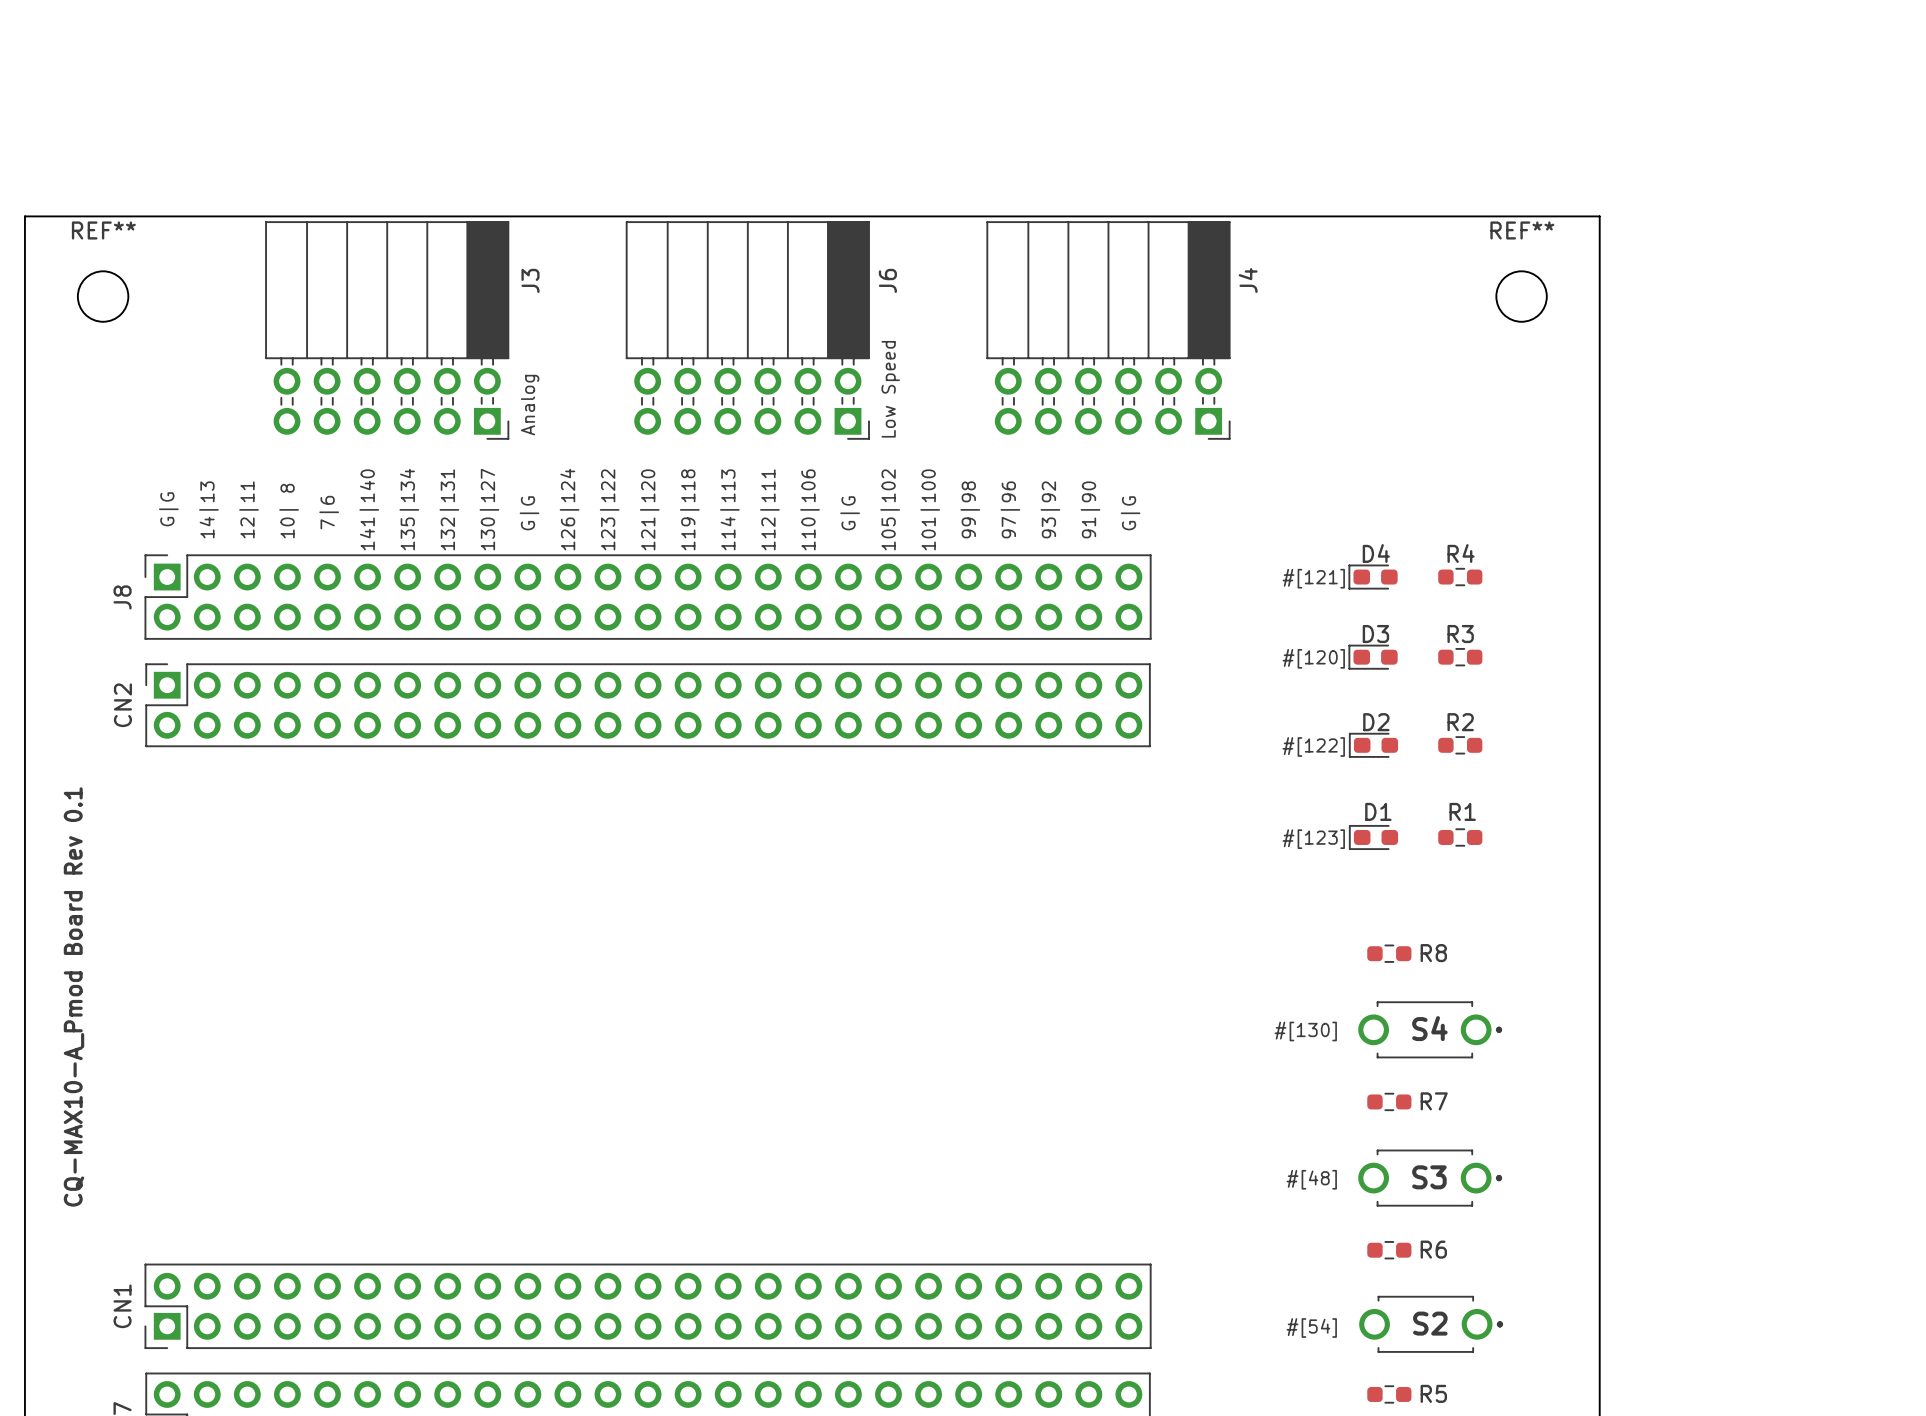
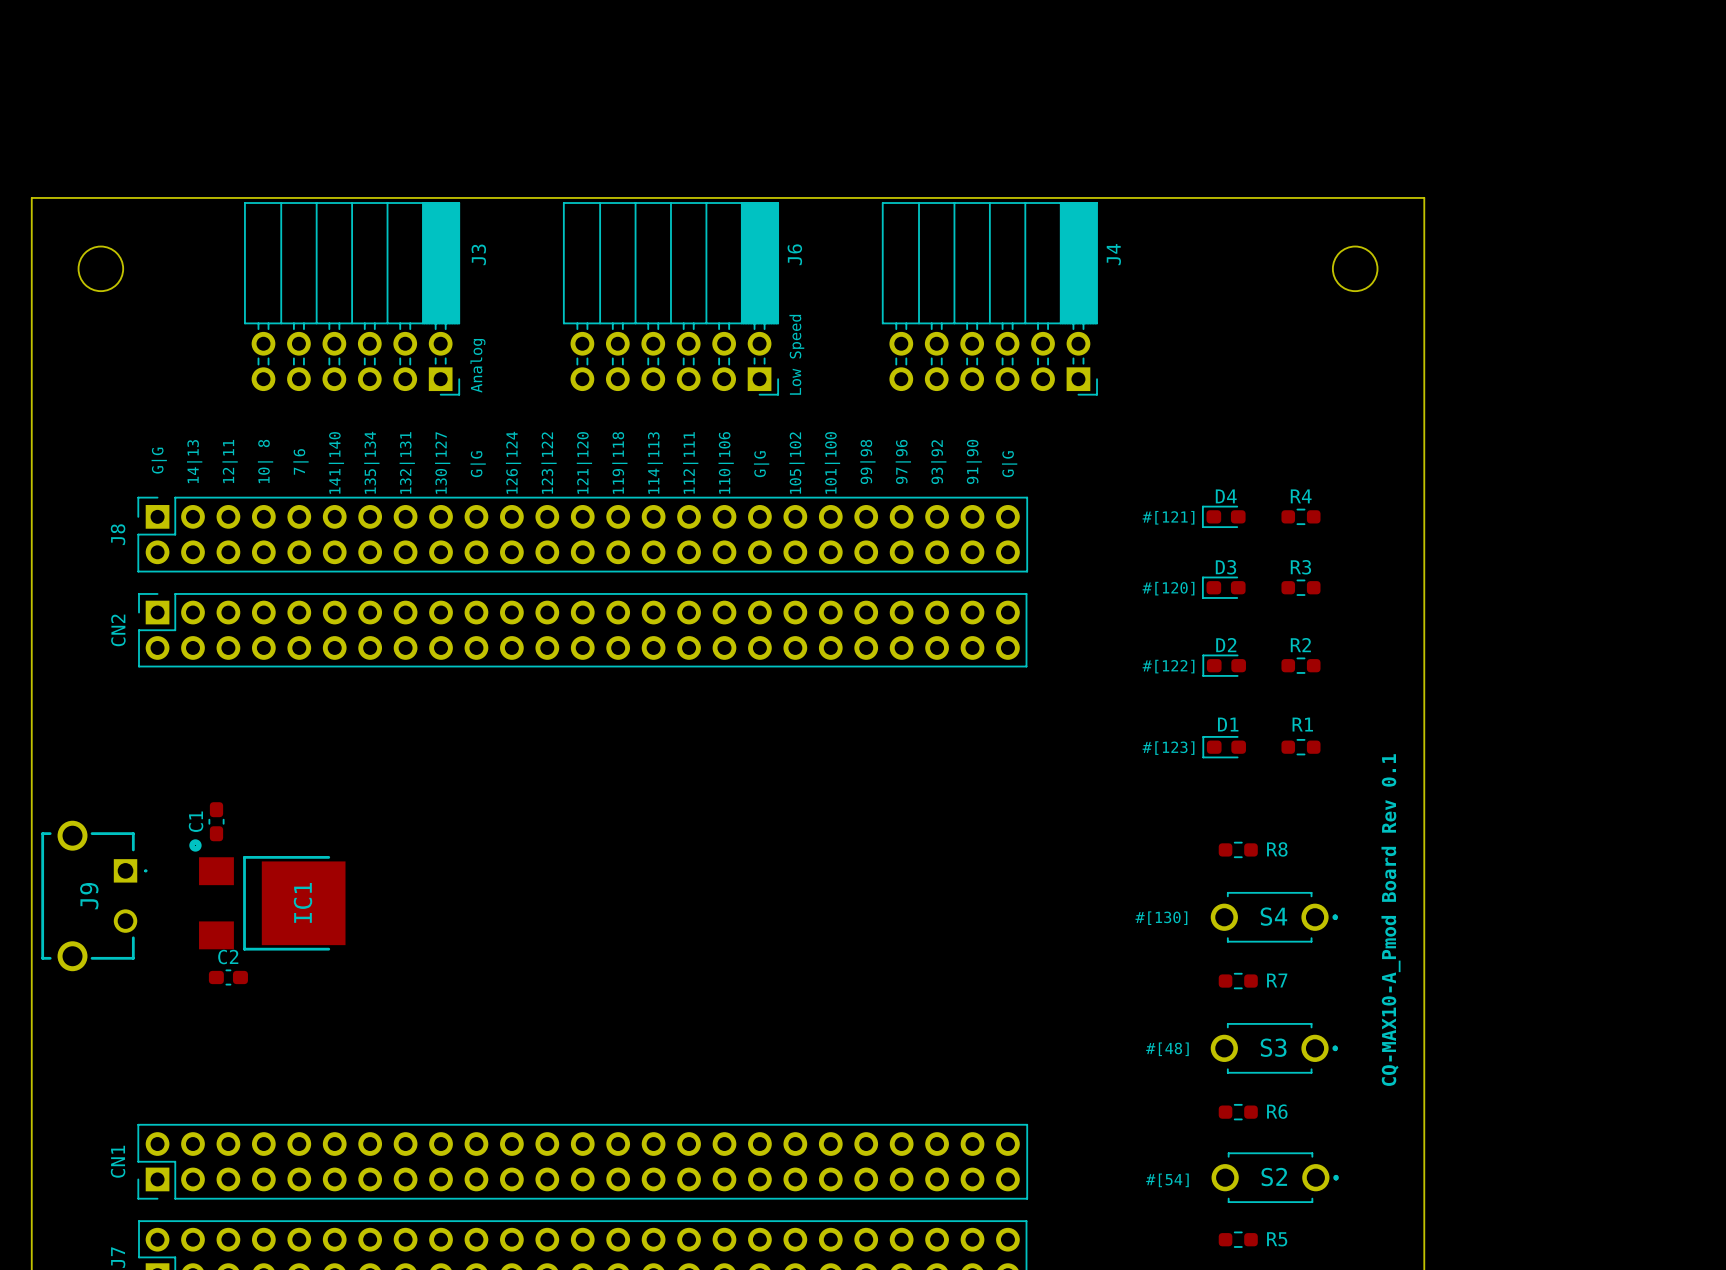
REF** name: REF** (103, 230) -> none
REF** name: REF** (1522, 230) -> none
C1: none -> (216, 821)
text: CQ-MAX10-A_Pmod Board Rev 0.1 (74, 996) -> none
IC1: none -> (267, 894)
J9: none -> (94, 895)
text: none -> CQ-MAX10-A_Pmod Board Rev 0.1 (1390, 920)
C2: none -> (228, 977)

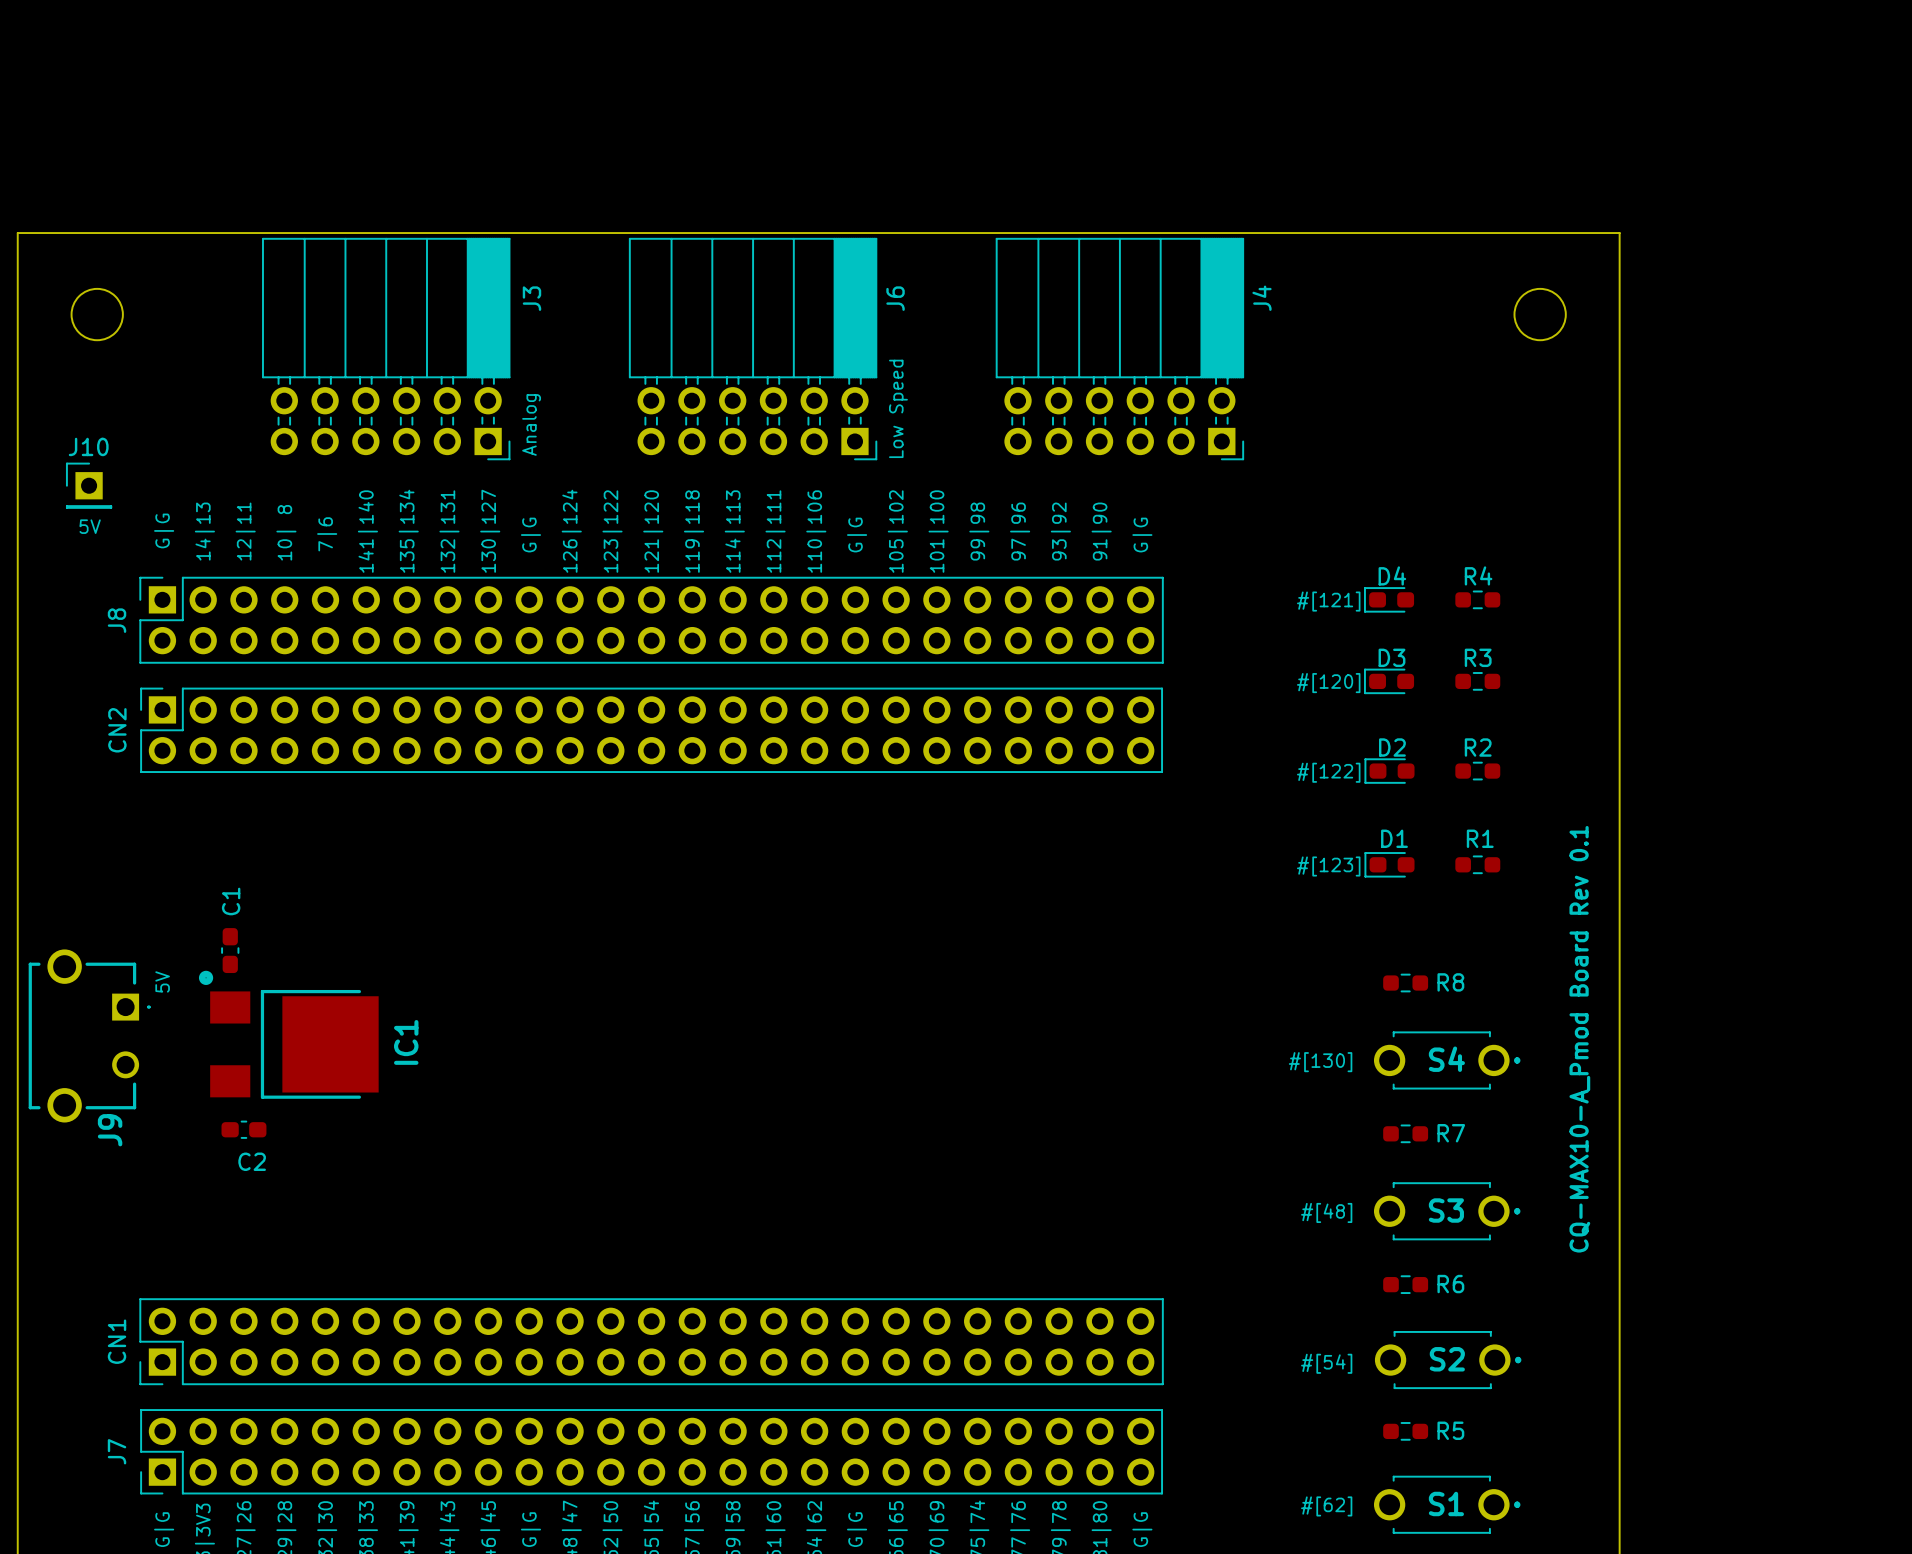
J10: none -> (89, 485)
text: none -> 5V (90, 526)
C1 name position: C1 (196, 821) -> C1 (231, 901)
text: none -> 5V (162, 981)
J9 name position: J9 (89, 896) -> J9 (110, 1130)
IC1 name position: IC1 (303, 902) -> IC1 (406, 1042)
C2 name position: C2 (228, 957) -> C2 (252, 1161)

